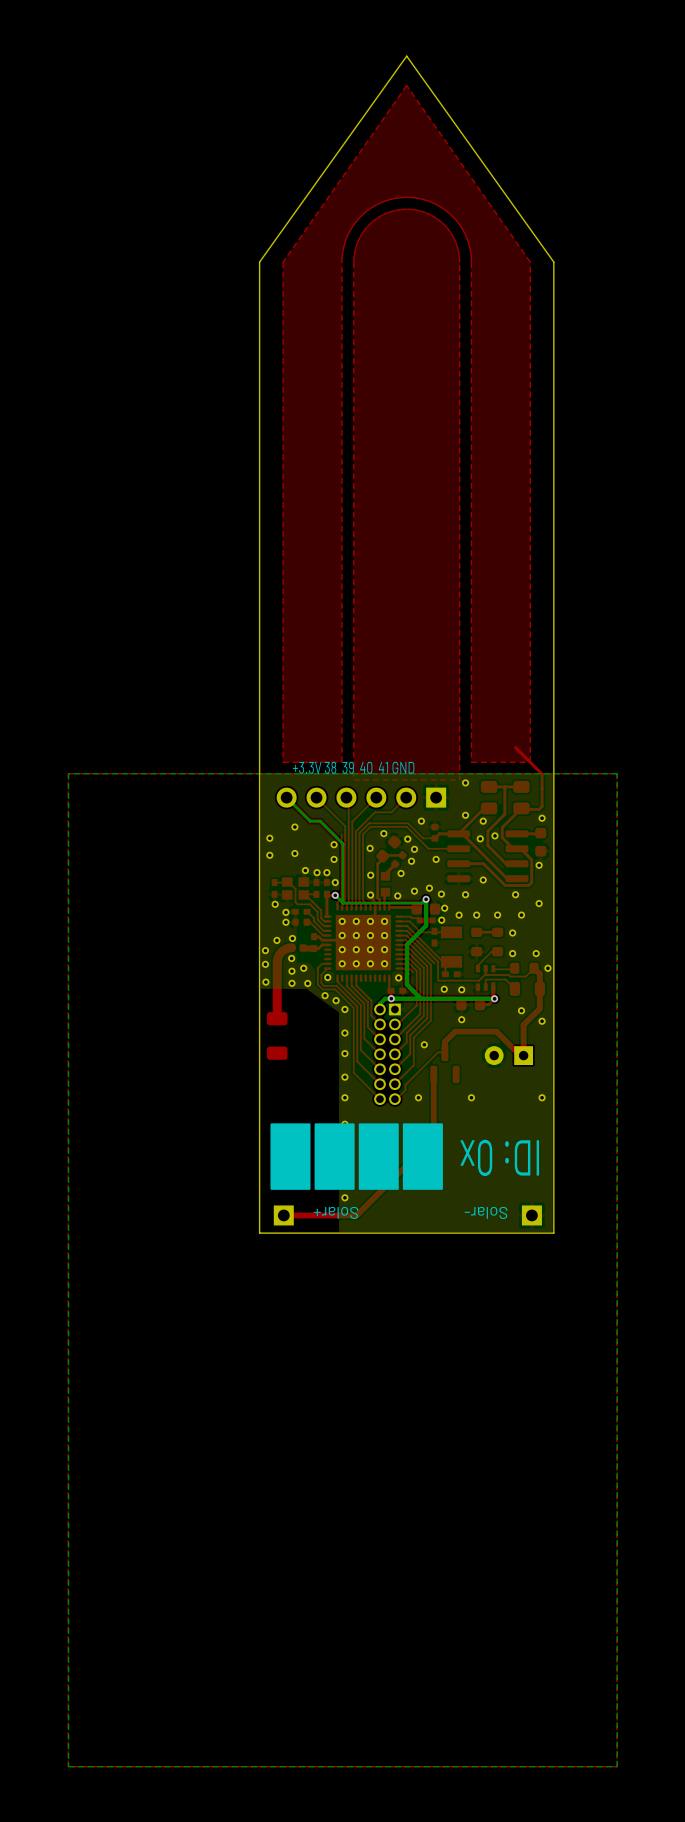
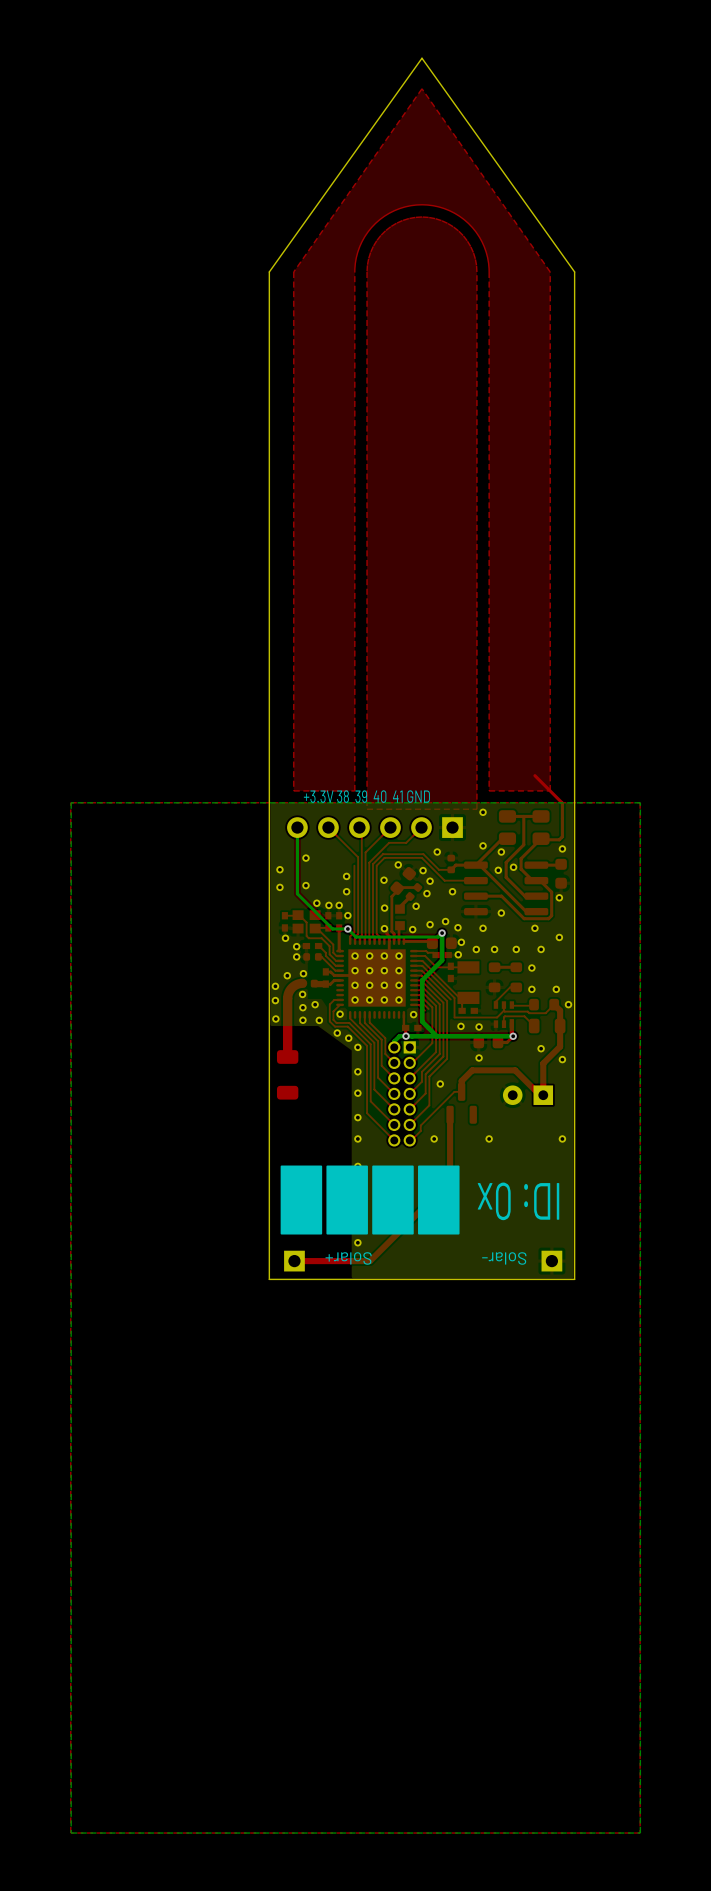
bottom track: (286, 797) (310, 821) (320, 821) (343, 843) (343, 903) -> (297, 827) (297, 893) (332, 928) (347, 928)

